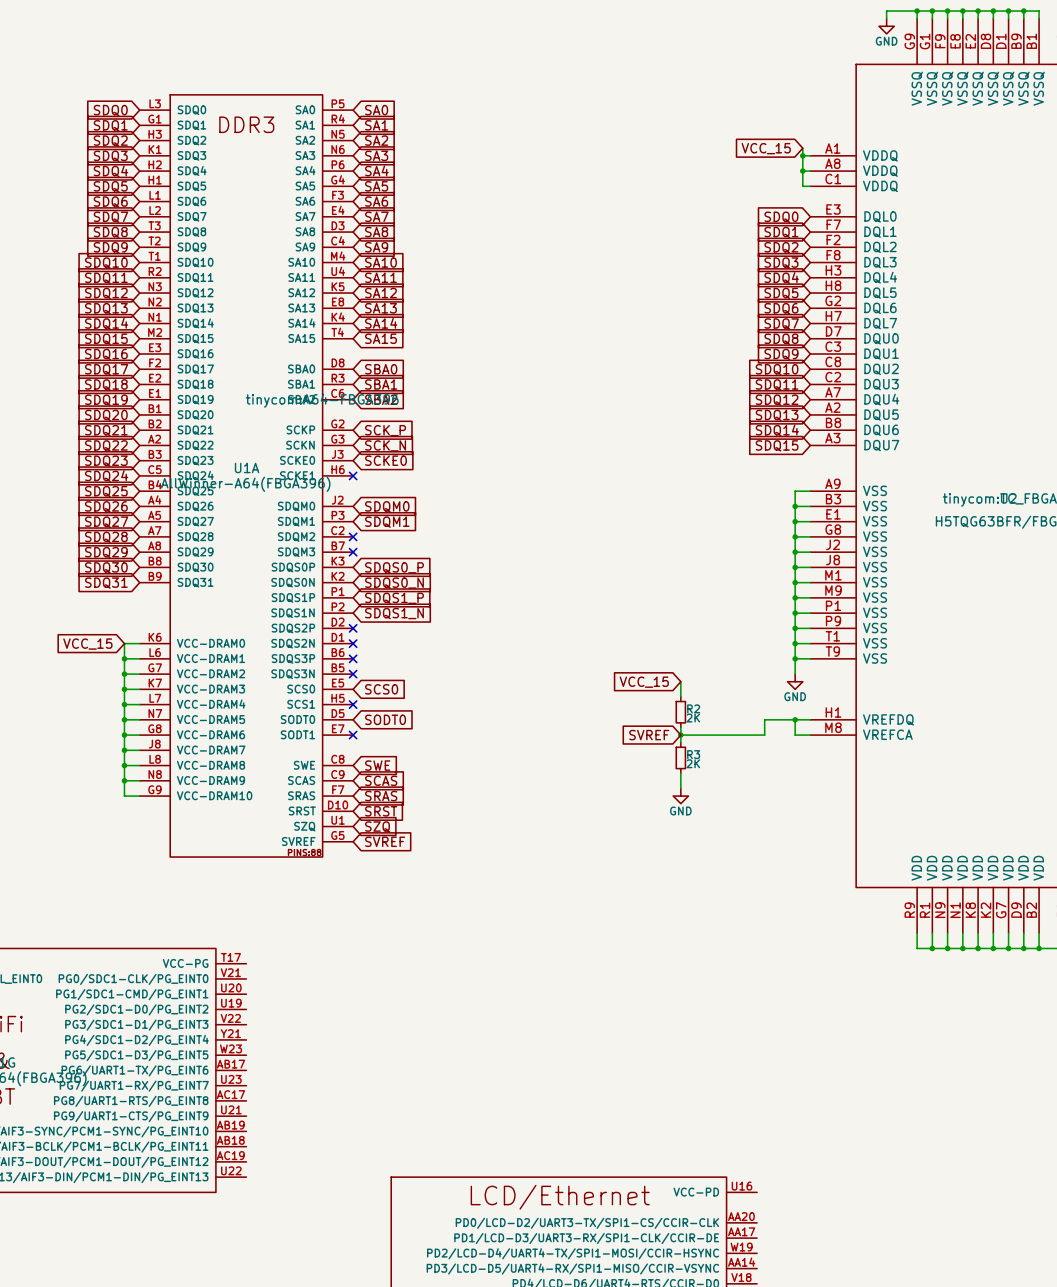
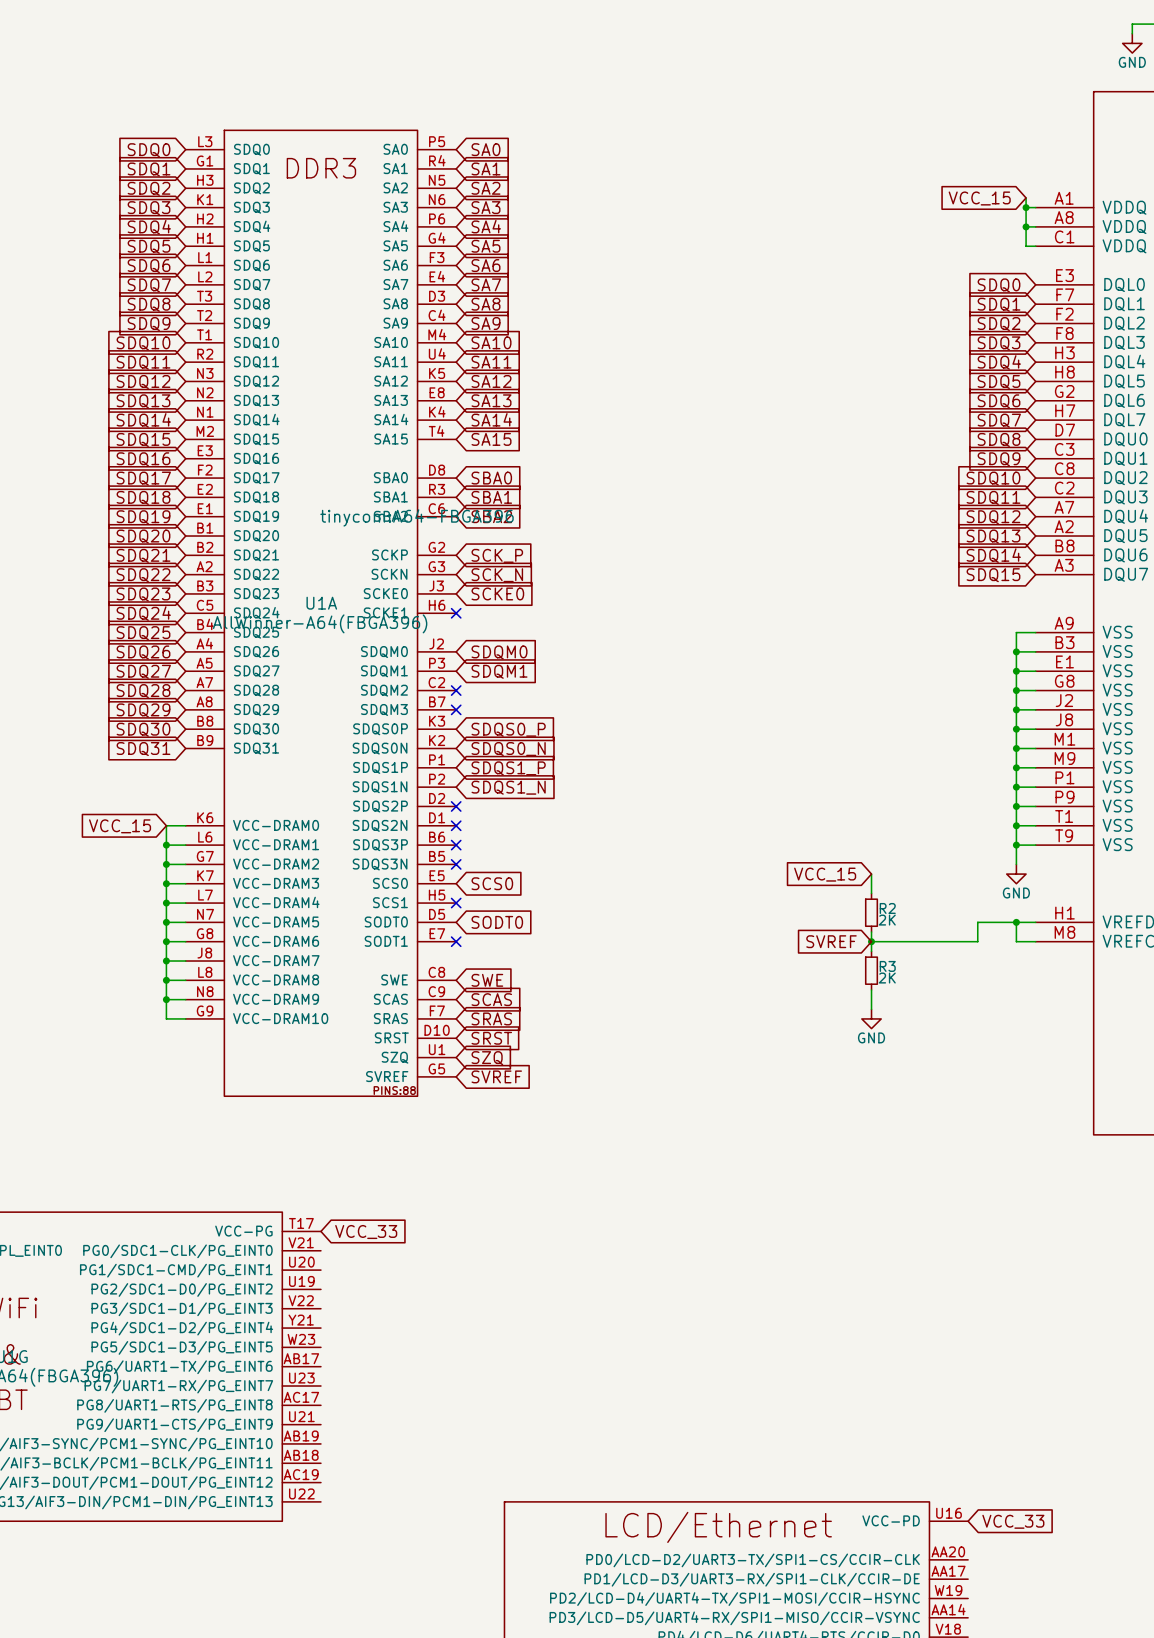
global label: none -> VCC_33 (366, 1232)
global label: none -> VCC_33 (1013, 1521)

